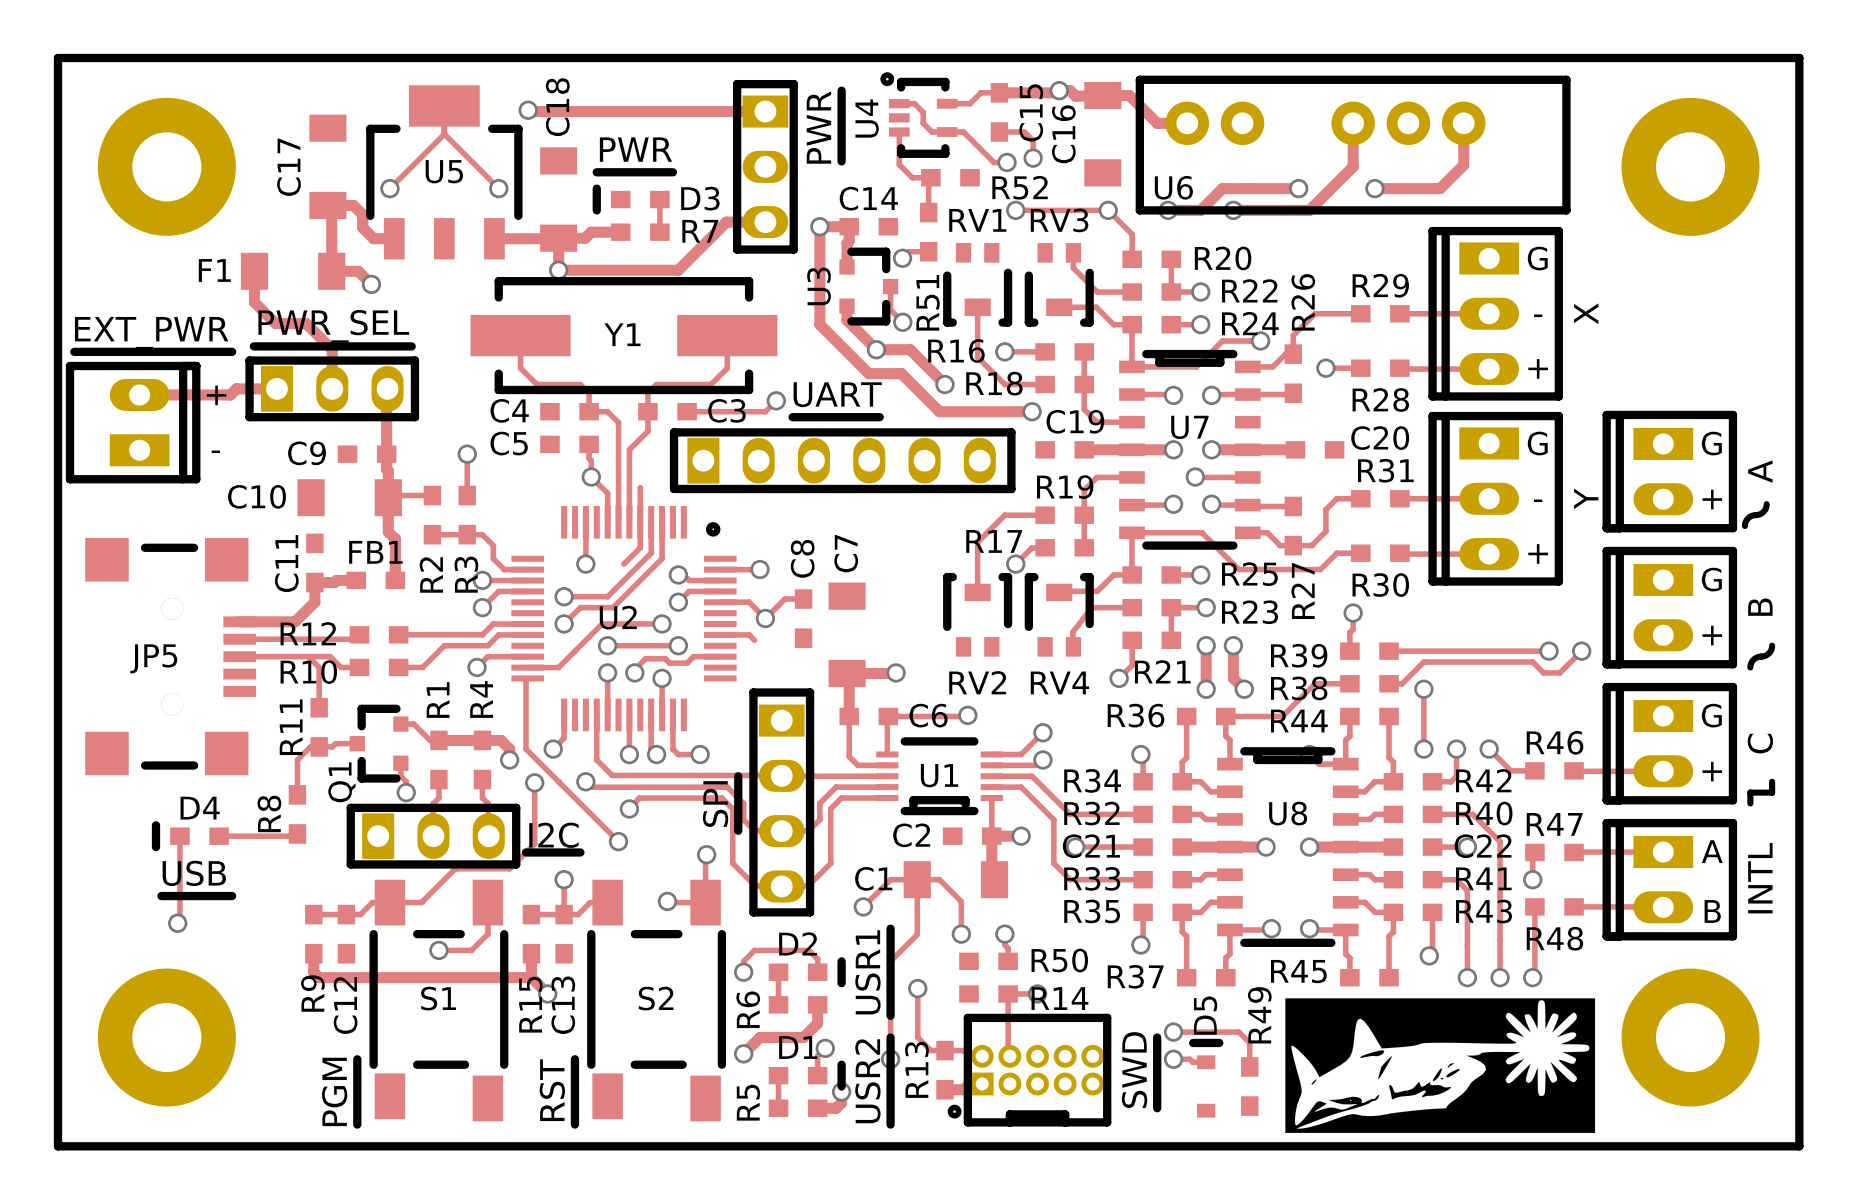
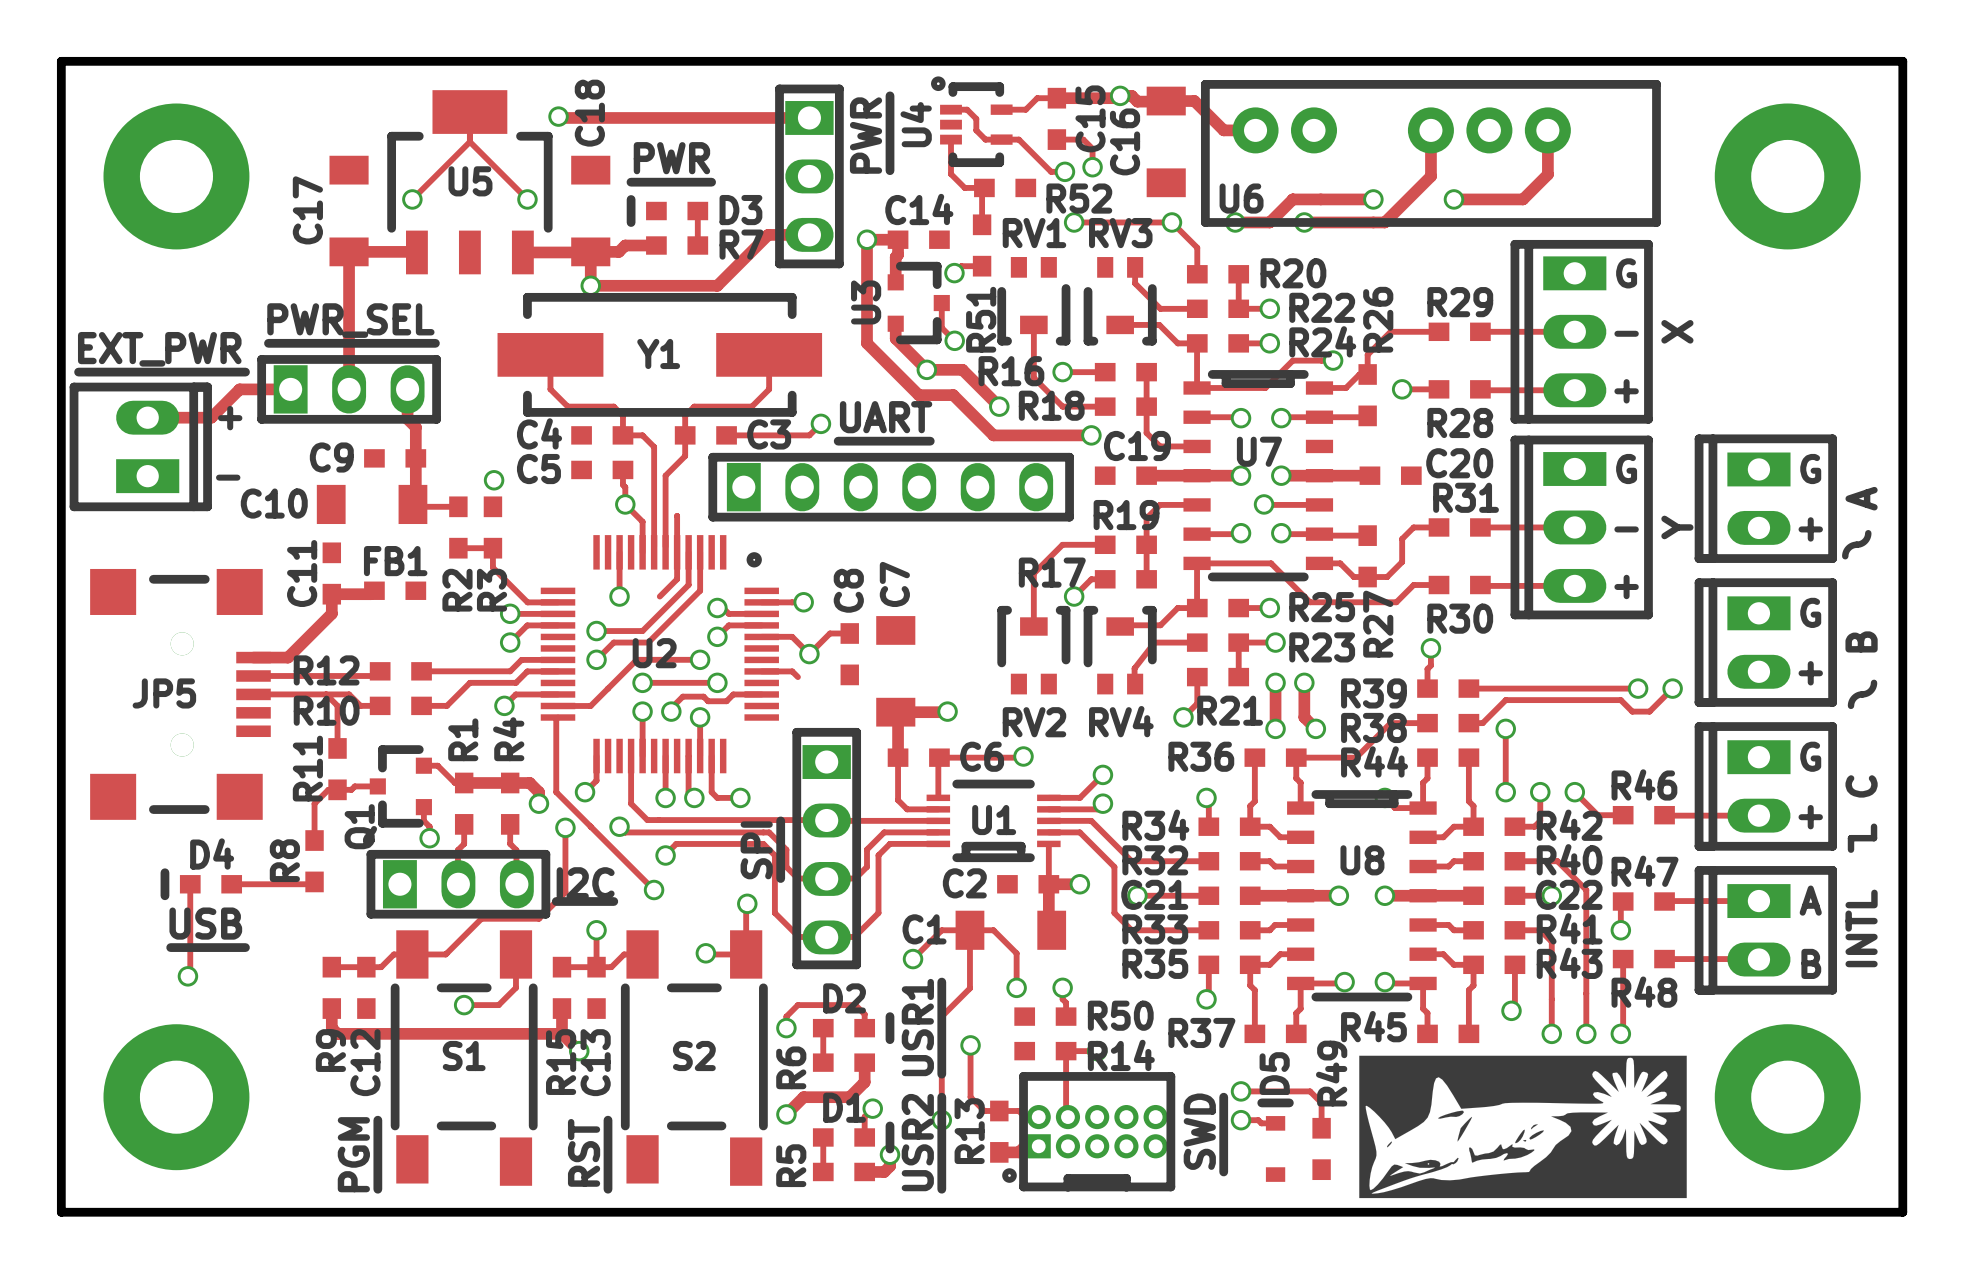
C17 position: (327, 166) -> (349, 211)
track: (394, 238) (373, 238) (362, 227) (362, 214) (353, 205) (327, 205) (331, 209) (331, 271) (358, 271) (371, 284) -> (416, 252) (349, 251) (349, 389)
track: (254, 271) (254, 302) (275, 323) (306, 323) (332, 349) (332, 388) -> none
F1: (293, 271) -> none
via: (371, 284) -> none
line: (253, 346) (411, 346) -> (268, 343) (435, 343)
track: none -> (407, 389) (407, 419) (415, 427) (415, 501) (412, 504) (415, 506) (458, 506)
track: (276, 388) (236, 388) (230, 394) (199, 394) -> (290, 389) (239, 389) (211, 417)
part position: (332, 388) -> (349, 389)
track: (387, 388) (388, 531) (395, 539) (395, 580) -> none
C9 position: (367, 454) -> (395, 458)
track: (467, 454) (467, 495) -> none
track: (432, 495) (390, 495) (388, 497) -> none
C10 position: (349, 497) -> (372, 504)
R2 position: (432, 515) -> (458, 527)
R3 position: (467, 515) -> (492, 527)
track: (432, 534) (482, 534) (493, 545) (493, 558) (504, 569) -> (458, 548) (492, 548) (492, 567) (527, 602) (533, 602)
C11 position: (314, 562) -> (331, 573)
track: (356, 580) (314, 582) (314, 602) (295, 621) (272, 621) -> (374, 590) (370, 594) (331, 594) (331, 613) (288, 657)
FB1 position: (375, 580) -> (395, 590)

